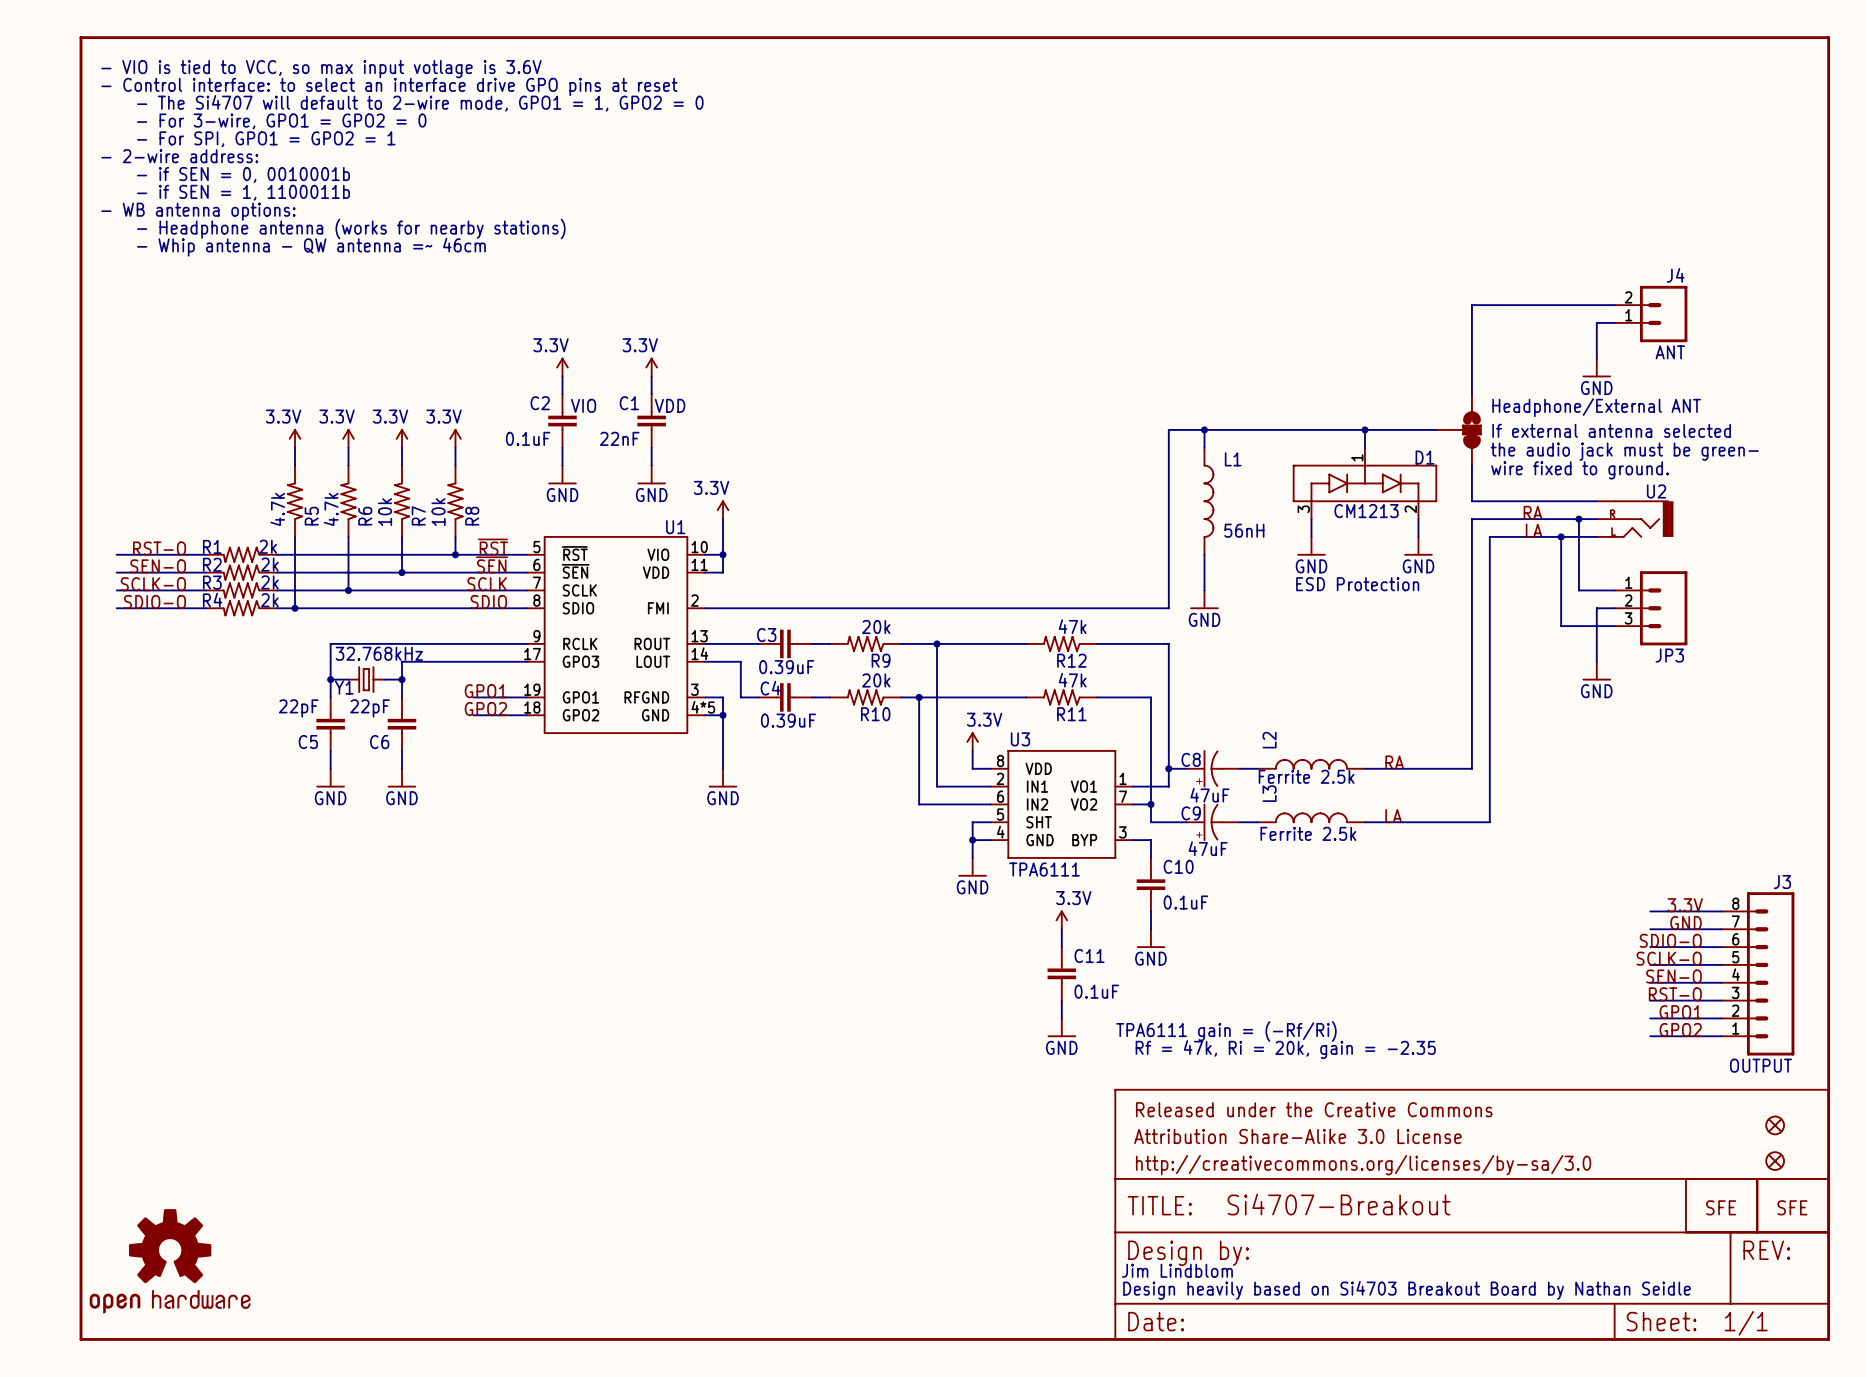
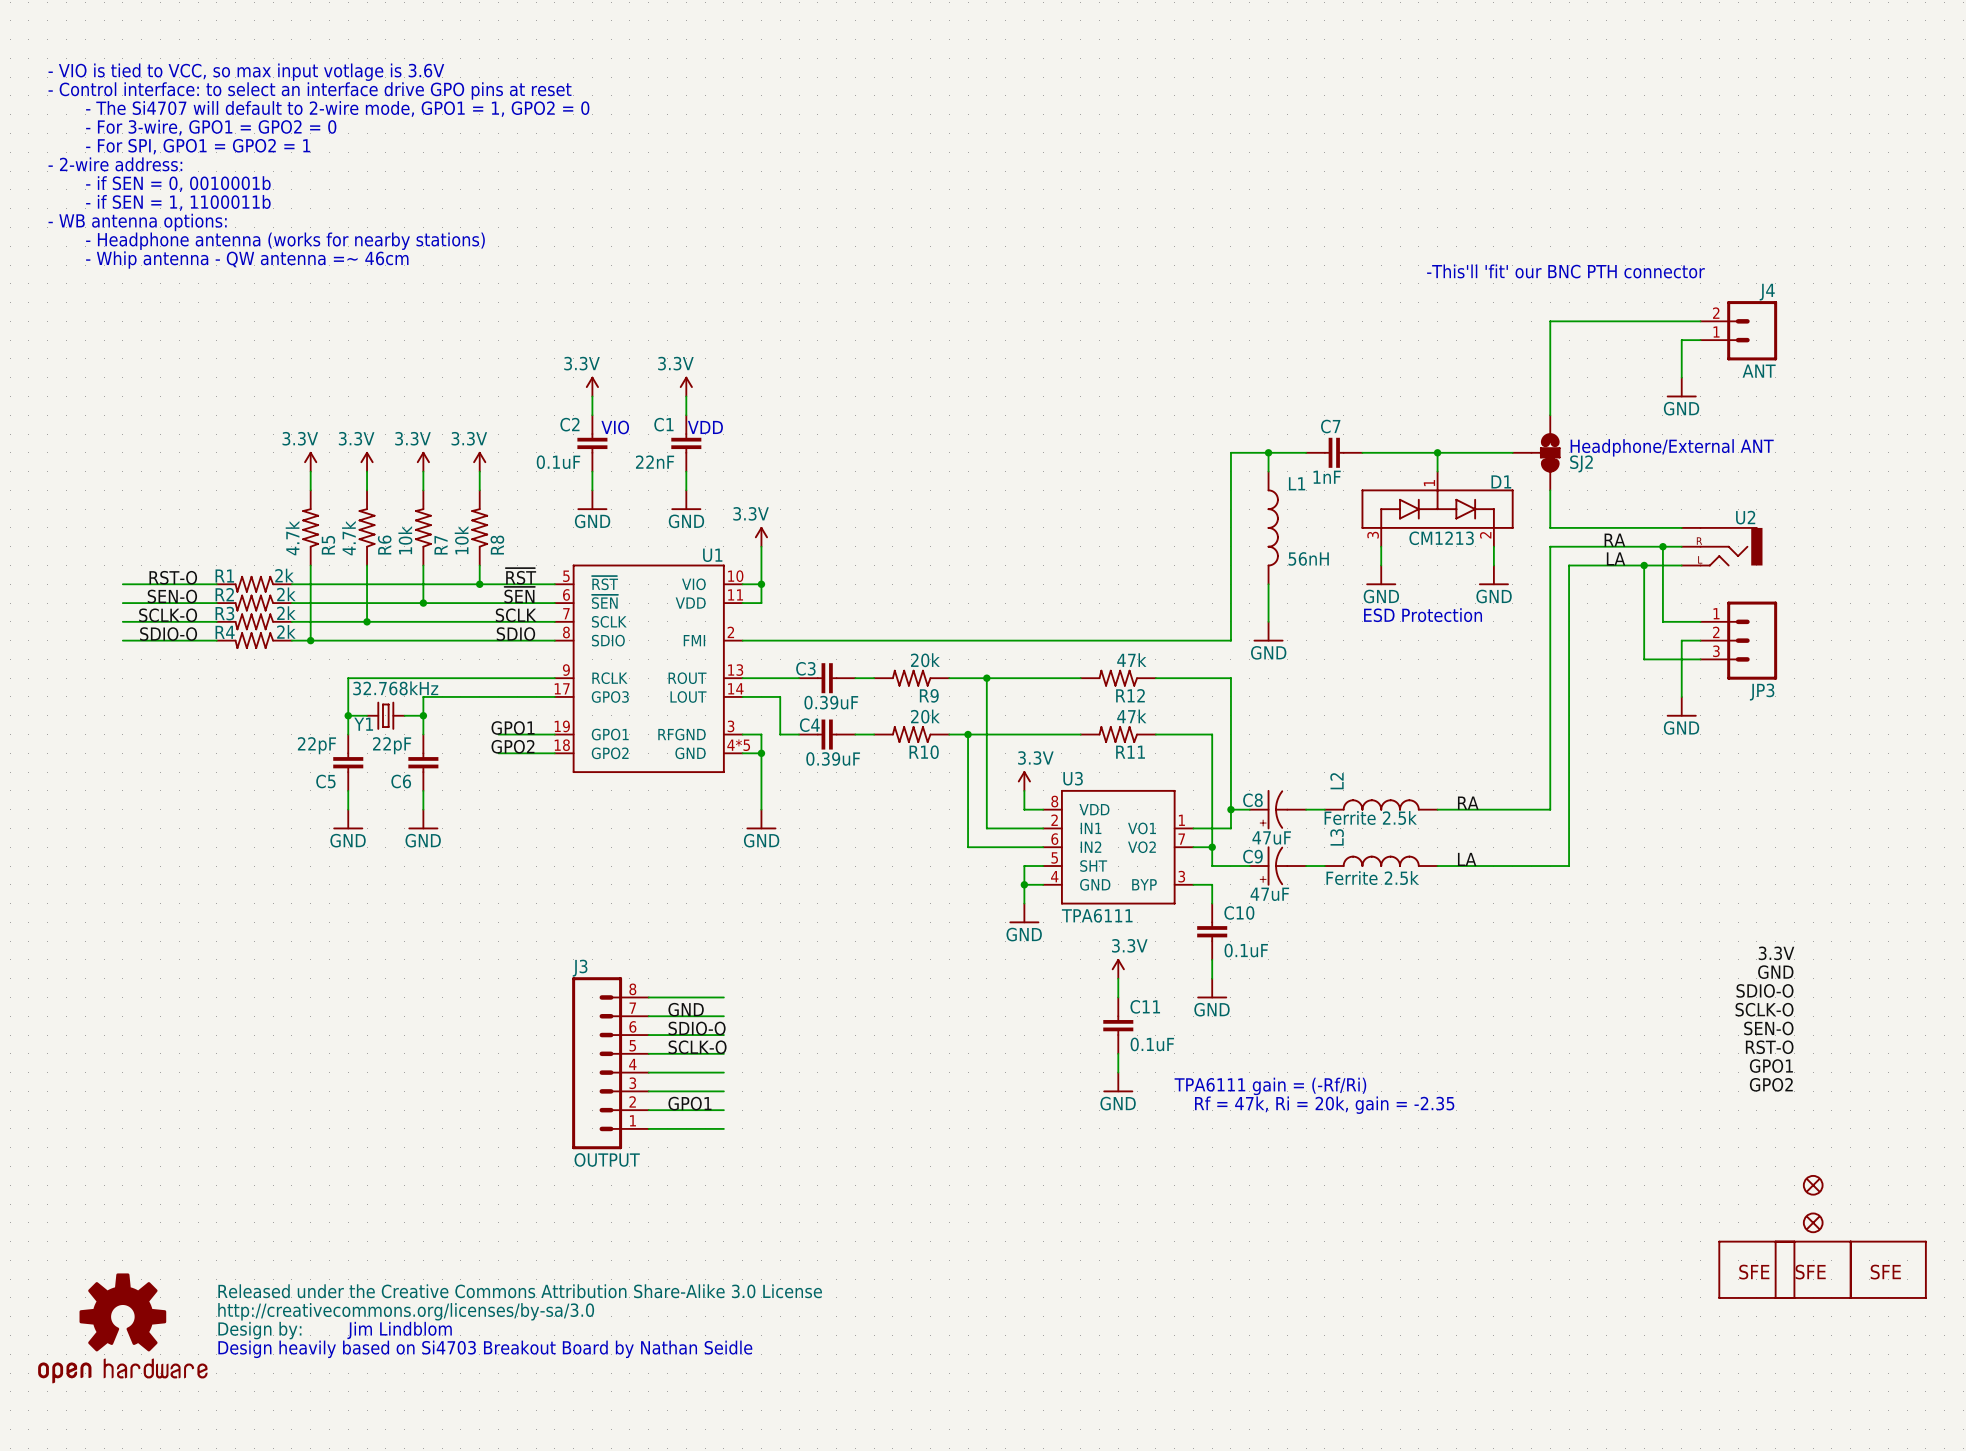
text position: - VIO is tied to VCC, so max input votlage is 3.6V (321, 69) -> - VIO is tied to VCC, so max input votlage is 3.6V (246, 72)
text position: - Control interface: to select an interface drive GPO pins at reset (389, 86) -> - Control interface: to select an interface drive GPO pins at reset (310, 90)
text position: - The Si4707 will default to 2-wire mode, GPO1 = 1, GPO2 = 0 (420, 103) -> - The Si4707 will default to 2-wire mode, GPO1 = 1, GPO2 = 0 (337, 108)
text position: - For 3-wire, GPO1 = GPO2 = 0 (281, 121) -> - For 3-wire, GPO1 = GPO2 = 0 (211, 127)
text position: - For SPI, GPO1 = GPO2 = 1 (266, 139) -> - For SPI, GPO1 = GPO2 = 1 (198, 146)
text position: - 2-wire address: (179, 156) -> - 2-wire address: (115, 164)
text position: - if SEN = 0, 0010001b (243, 174) -> - if SEN = 0, 0010001b (178, 184)
text position: - if SEN = 1, 1100011b (243, 192) -> - if SEN = 1, 1100011b (178, 202)
text position: - WB antenna options: (198, 211) -> - WB antenna options: (137, 222)
text position: - Headphone antenna (works for nearby stations) (351, 229) -> - Headphone antenna (works for nearby stations) (285, 241)
text position: - Whip antenna - QW antenna =~ 46cm (311, 247) -> - Whip antenna - QW antenna =~ 46cm (247, 260)
text: none -> -This'll 'fit' our BNC PTH connector (1565, 271)
text position: Headphone/External ANT (1596, 407) -> Headphone/External ANT (1672, 447)
C7: none -> 1nF (1334, 452)
text: If external antenna selected (1611, 430) -> none
SJ2 name: none -> SJ2 (1581, 463)
text: the audio jack must be green- (1624, 451) -> none
text: wire fixed to ground. (1580, 470) -> none
part: (954, 688) -> none
wire: (1650, 911) (1721, 911) -> none
wire: (1650, 929) (1721, 929) -> none
wire: none -> (648, 997) (723, 997)
wire: (1650, 947) (1721, 947) -> none
label: none -> GND (686, 1009)
wire: none -> (648, 1016) (723, 1016)
wire: (1650, 964) (1721, 964) -> none
J3 position: (1758, 973) -> (610, 1063)
J3 flip: as is (1770, 973) -> left-right (597, 1063)
label: none -> SDIO-O (697, 1028)
wire: none -> (648, 1035) (723, 1035)
wire: (1650, 982) (1721, 982) -> none
label: none -> SCLK-O (697, 1047)
wire: none -> (648, 1053) (723, 1053)
wire: (1650, 1000) (1721, 1000) -> none
wire: none -> (648, 1072) (723, 1072)
wire: (1650, 1018) (1721, 1018) -> none
wire: none -> (648, 1091) (723, 1091)
wire: (1650, 1036) (1721, 1036) -> none
label: none -> GPO1 (689, 1103)
wire: none -> (648, 1110) (723, 1110)
wire: none -> (648, 1128) (723, 1128)
part: none -> (1813, 1185)
part: (1775, 1125) -> none
part: none -> (1813, 1222)
part: (1775, 1161) -> none
part: none -> (1756, 1269)
part: (1471, 1214) -> none
part: none -> (520, 1311)
part position: (170, 1261) -> (122, 1328)
text: none -> Jim Lindblom (399, 1330)
text: Jim Lindblom (1177, 1270) -> none
text: none -> Design heavily based on Si4703 Breakout Board by Nathan Seidle (485, 1349)
text: Design heavily based on Si4703 Breakout Board by Nathan Seidle (1407, 1290) -> none

